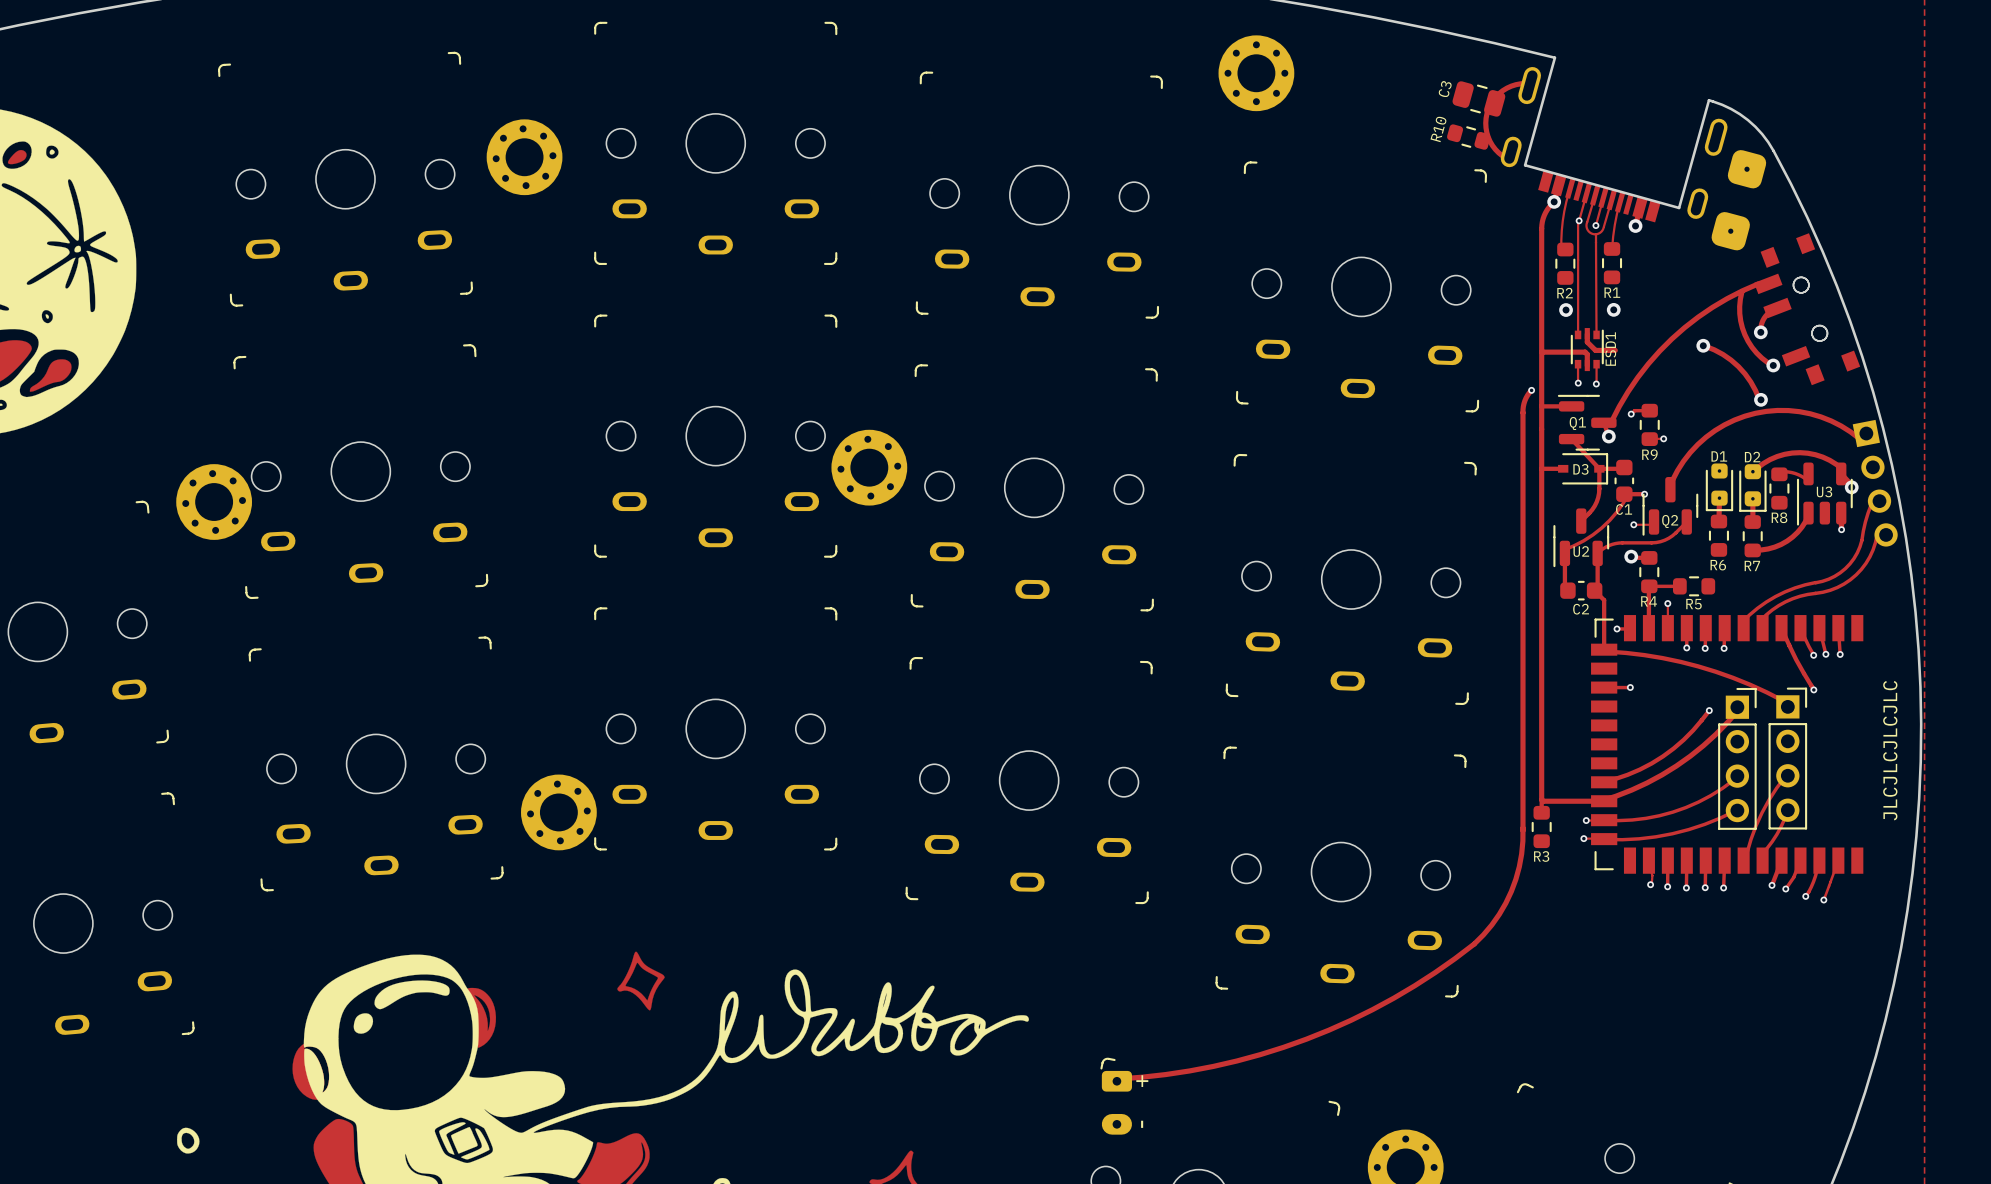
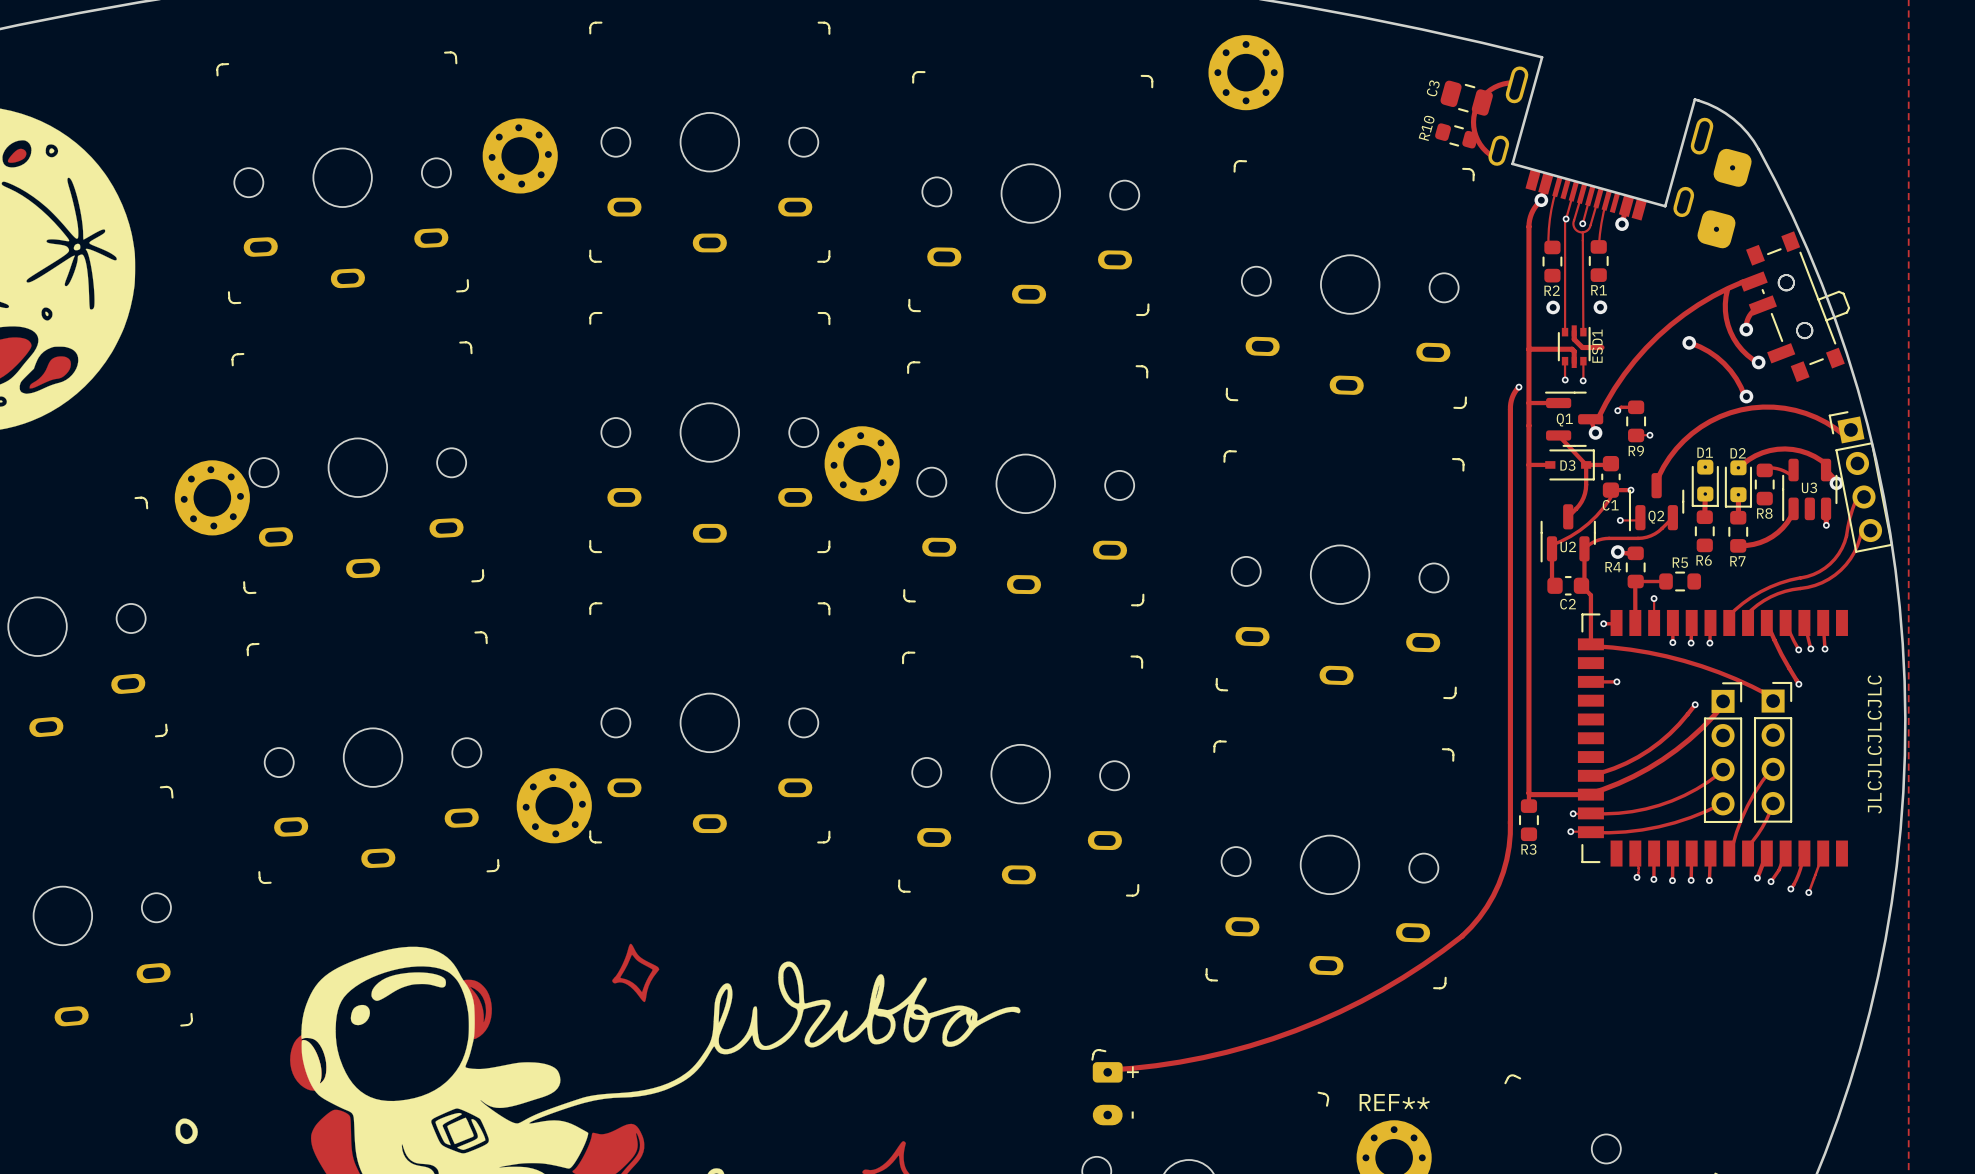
part footprint: [1754, 233, 1861, 386] -> [1739, 231, 1851, 383]
part footprint: [1852, 419, 1898, 547] -> [1828, 411, 1893, 553]
R4 name position: R4 (1649, 601) -> R4 (1613, 567)
R5 name position: R5 (1693, 604) -> R5 (1680, 562)
REF** name: none -> REF** (1394, 1102)

